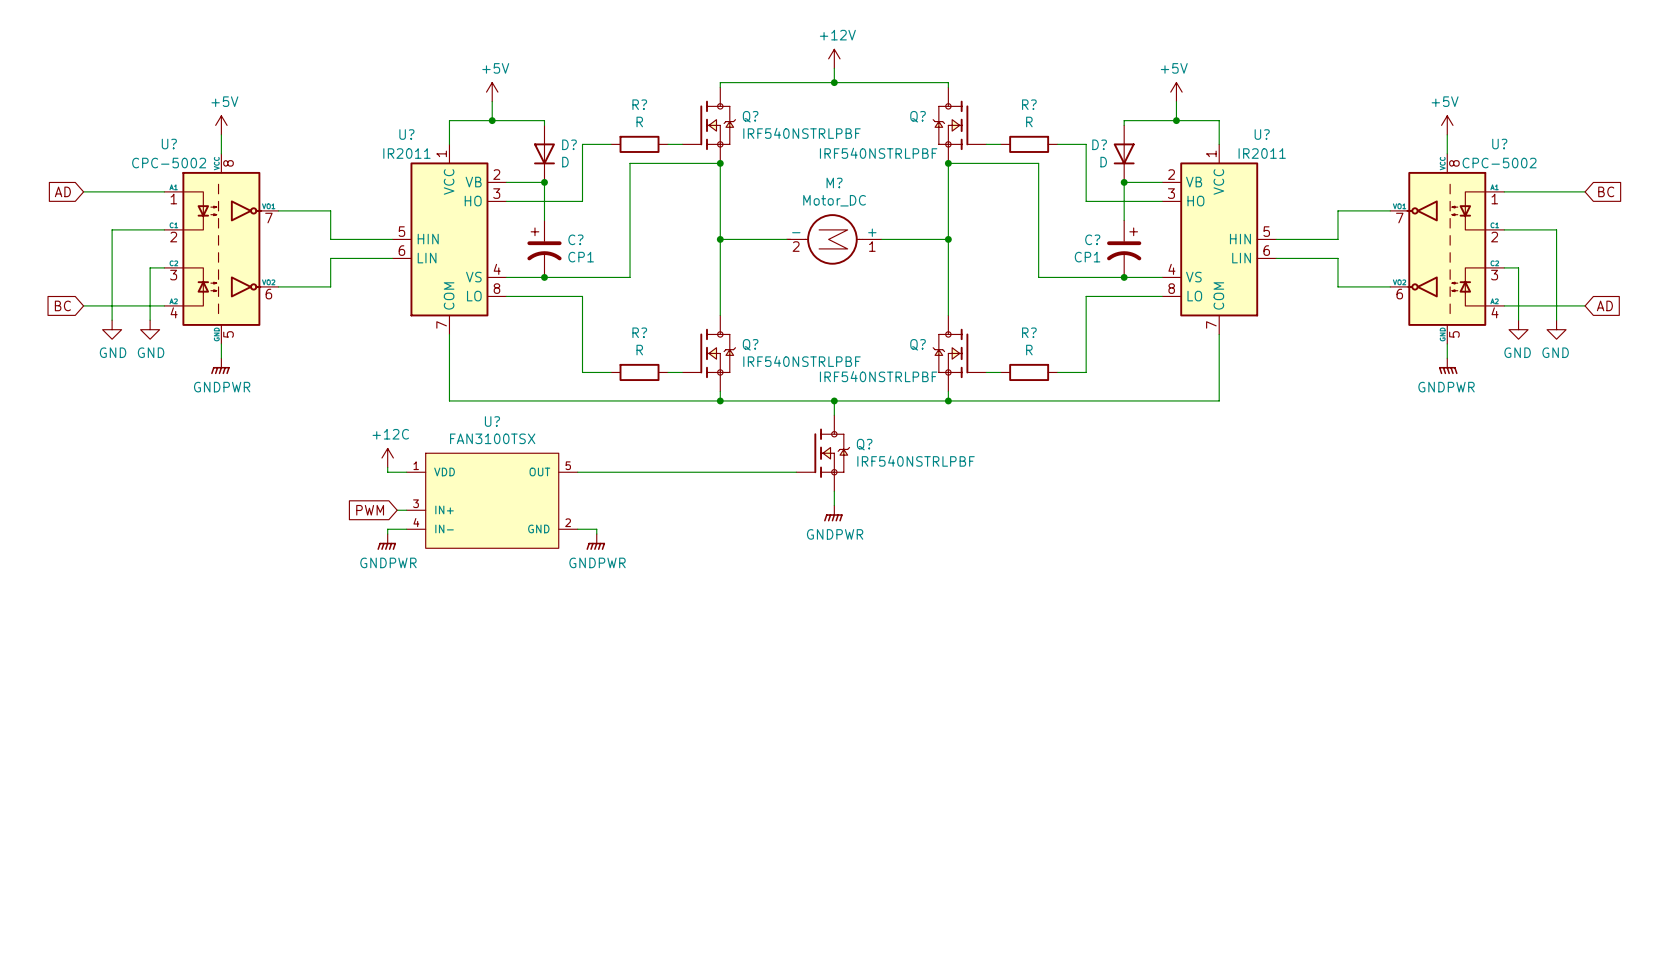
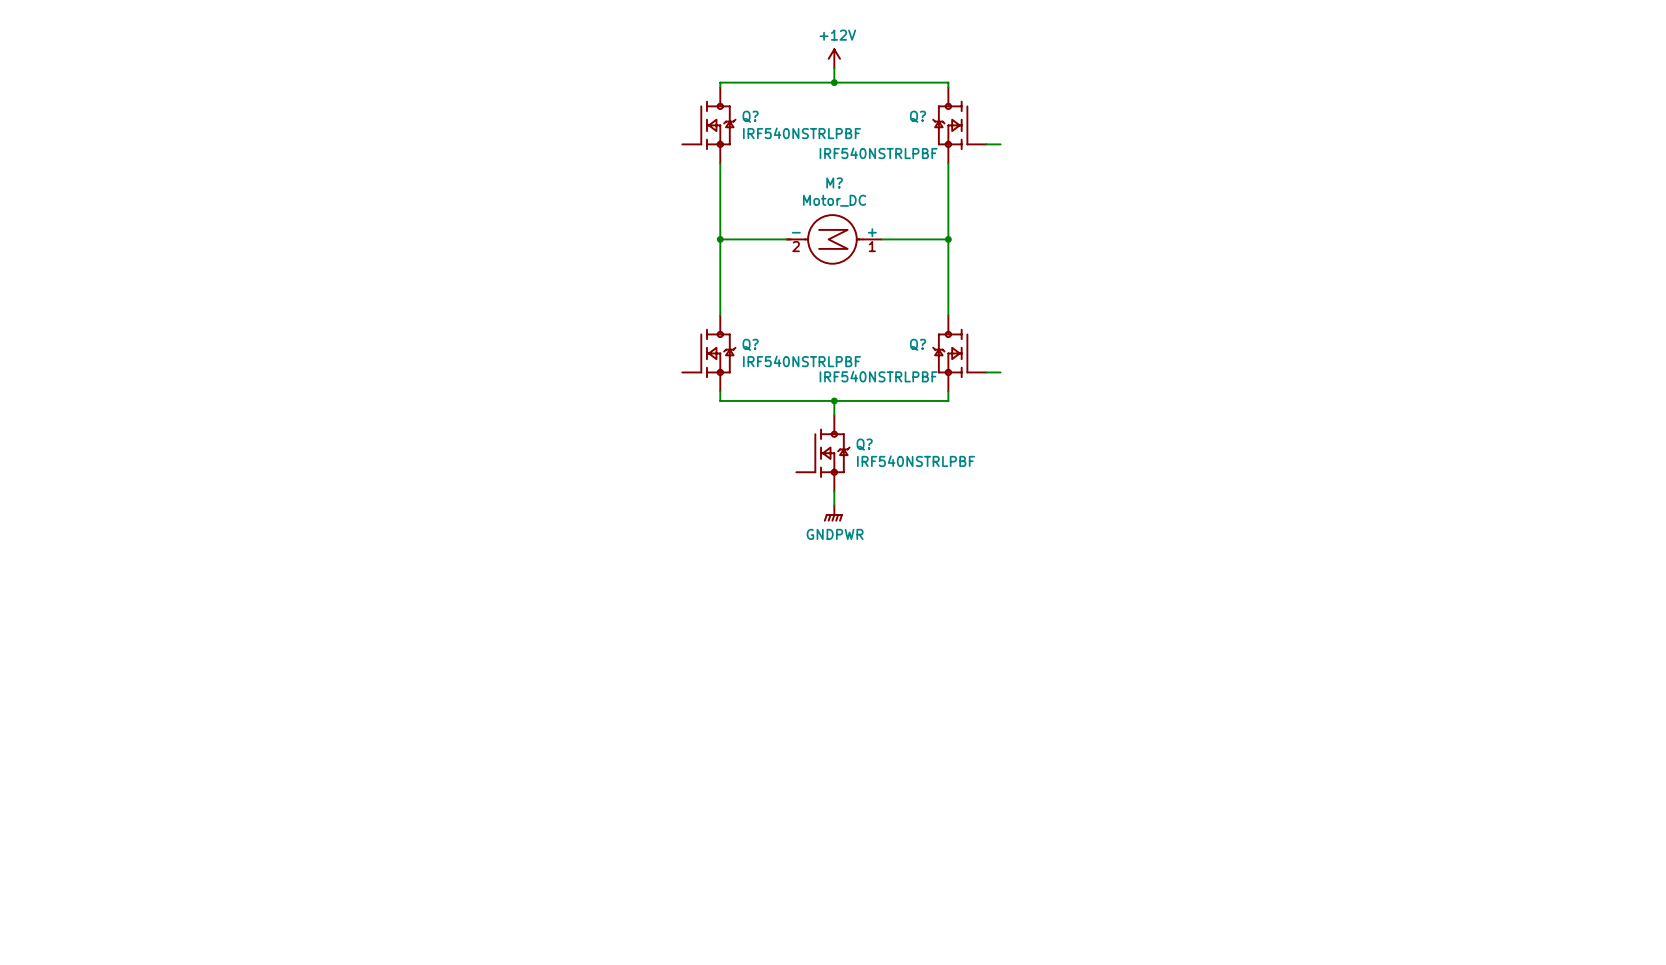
power symbol: +5V (492, 92) -> none
power symbol: +5V (1176, 92) -> none
wire: (492, 101) (492, 120) -> none
wire: (1176, 101) (1176, 120) -> none
junction: (492, 120) -> none
junction: (1176, 120) -> none
power symbol: +5V (221, 125) -> none
wire: (544, 125) (544, 120) (449, 120) (449, 144) -> none
wire: (1124, 125) (1124, 120) (1219, 120) (1219, 144) -> none
power symbol: +5V (1447, 125) -> none
wire: (221, 134) (221, 153) -> none
wire: (1447, 134) (1447, 153) -> none
wire: (611, 144) (582, 144) (582, 201) (506, 201) -> none
R?: R (639, 144) -> none
wire: (668, 144) (682, 144) -> none
R?: R (1029, 144) -> none
wire: (1057, 144) (1086, 144) (1086, 201) (1162, 201) -> none
D?: D (544, 153) -> none
D?: D (1124, 153) -> none
wire: (720, 163) (630, 163) (630, 277) (506, 277) -> none
junction: (720, 163) -> none
wire: (948, 163) (1038, 163) (1038, 277) (1162, 277) -> none
junction: (948, 163) -> none
wire: (506, 182) (544, 182) (544, 220) -> none
junction: (544, 182) -> none
junction: (1124, 182) -> none
wire: (1162, 182) (1124, 182) (1124, 220) -> none
global label: AD (62, 191) -> none
wire: (83, 191) (164, 191) -> none
wire: (1504, 191) (1585, 191) -> none
global label: BC (1606, 191) -> none
wire: (278, 210) (330, 210) (330, 239) (392, 239) -> none
wire: (1390, 210) (1337, 210) (1337, 239) (1276, 239) -> none
wire: (164, 229) (112, 229) (112, 320) -> none
wire: (1504, 229) (1556, 229) (1556, 320) -> none
U?: IR2011 (449, 239) -> none
U?: IR2011 (1219, 239) -> none
U?: CPC-5002 (221, 248) -> none
C?: CP1 (544, 248) -> none
C?: CP1 (1124, 248) -> none
U?: CPC-5002 (1447, 248) -> none
wire: (392, 258) (330, 258) (330, 286) (278, 286) -> none
wire: (1276, 258) (1337, 258) (1337, 286) (1390, 286) -> none
wire: (164, 267) (150, 267) (150, 320) -> none
wire: (1504, 267) (1518, 267) (1518, 320) -> none
junction: (544, 277) -> none
junction: (1124, 277) -> none
wire: (506, 296) (582, 296) (582, 372) (611, 372) -> none
wire: (1162, 296) (1086, 296) (1086, 372) (1057, 372) -> none
global label: BC (62, 305) -> none
wire: (83, 305) (164, 305) -> none
wire: (1504, 305) (1585, 305) -> none
global label: AD (1604, 305) -> none
power symbol: GND (112, 329) -> none
power symbol: GND (150, 329) -> none
power symbol: GND (1518, 329) -> none
power symbol: GND (1556, 329) -> none
wire: (449, 334) (449, 400) (720, 400) -> none
wire: (1219, 334) (1219, 400) (948, 400) -> none
wire: (221, 343) (221, 358) -> none
wire: (1447, 343) (1447, 358) -> none
power symbol: GNDPWR (220, 366) -> none
power symbol: GNDPWR (1448, 366) -> none
R?: R (639, 372) -> none
wire: (668, 372) (682, 372) -> none
R?: R (1029, 372) -> none
junction: (720, 400) -> none
junction: (948, 400) -> none
power symbol: +12C (387, 457) -> none
wire: (387, 467) (387, 472) (406, 472) -> none
wire: (577, 472) (796, 472) -> none
U?: FAN3100TSX (492, 500) -> none
global label: PWM (370, 510) -> none
wire: (397, 510) (406, 510) -> none
wire: (406, 529) (387, 529) (387, 534) -> none
wire: (577, 529) (596, 529) (596, 534) -> none
power symbol: GNDPWR (386, 541) -> none
power symbol: GNDPWR (595, 541) -> none

